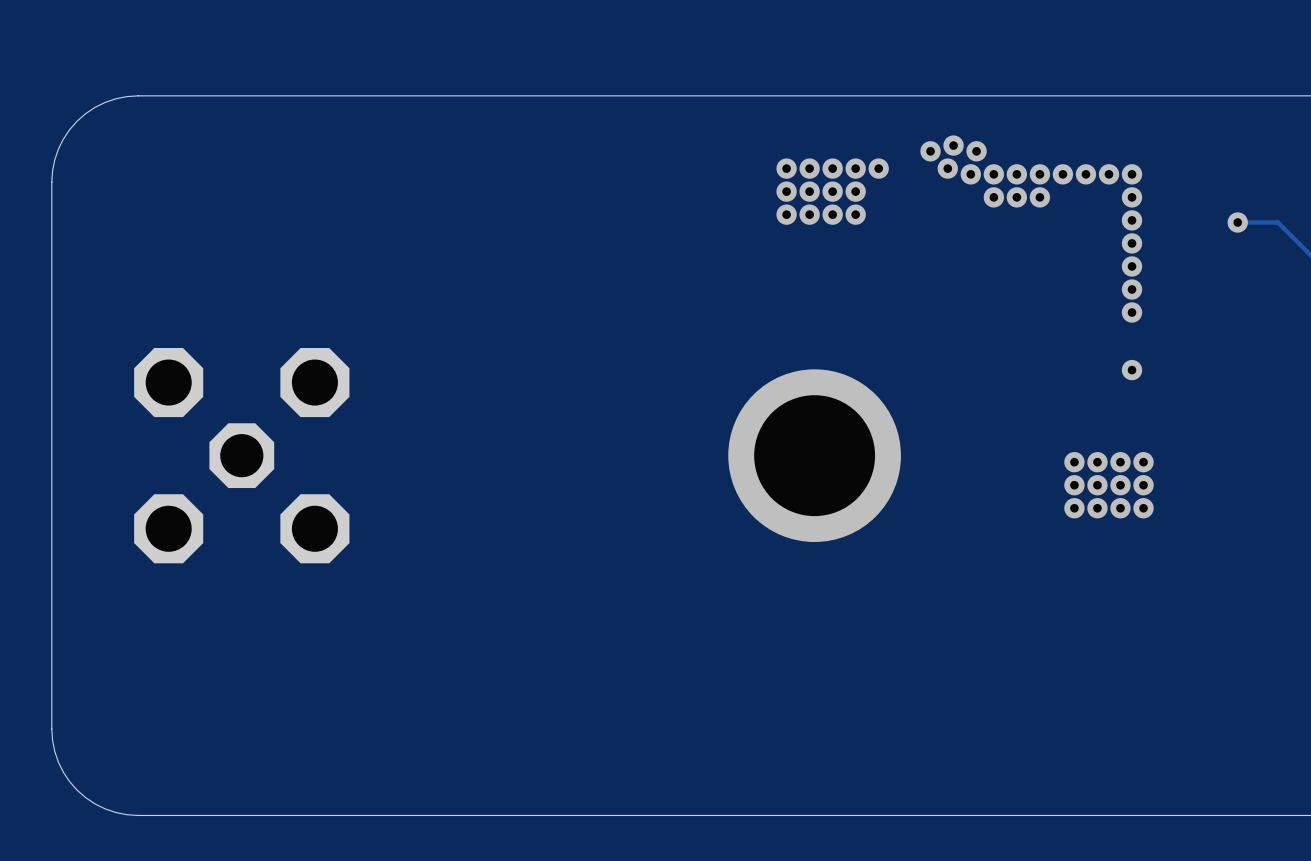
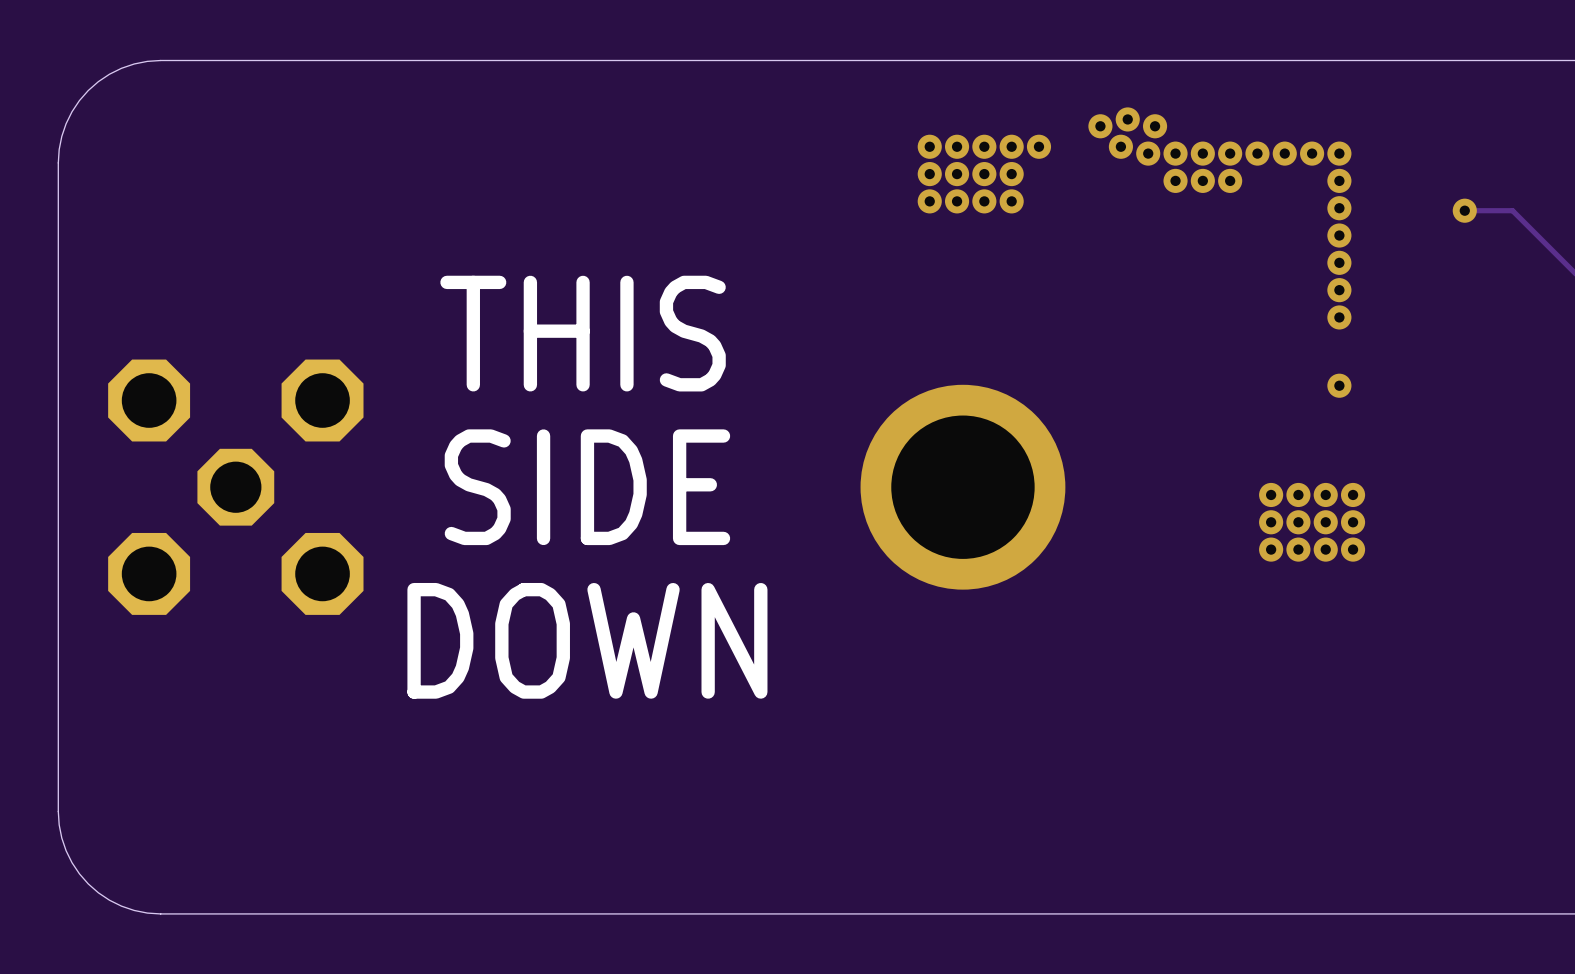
text: none -> THIS (583, 333)
part position: (241, 455) -> (235, 487)
text: none -> SIDE (587, 487)
text: none -> DOWN (587, 640)

